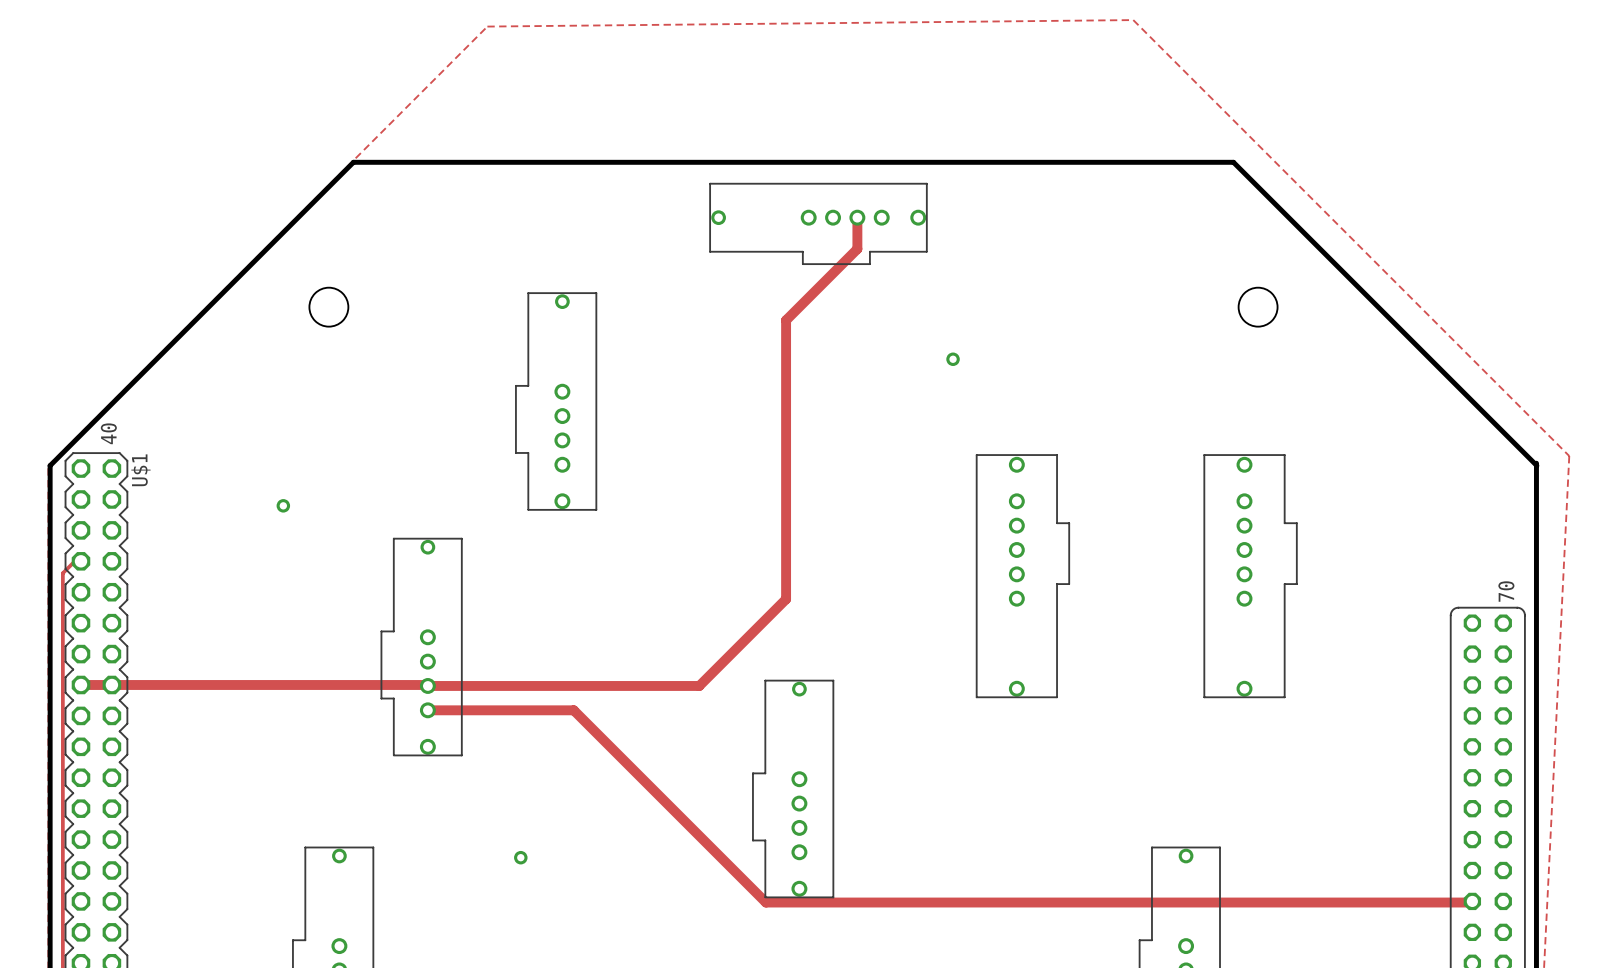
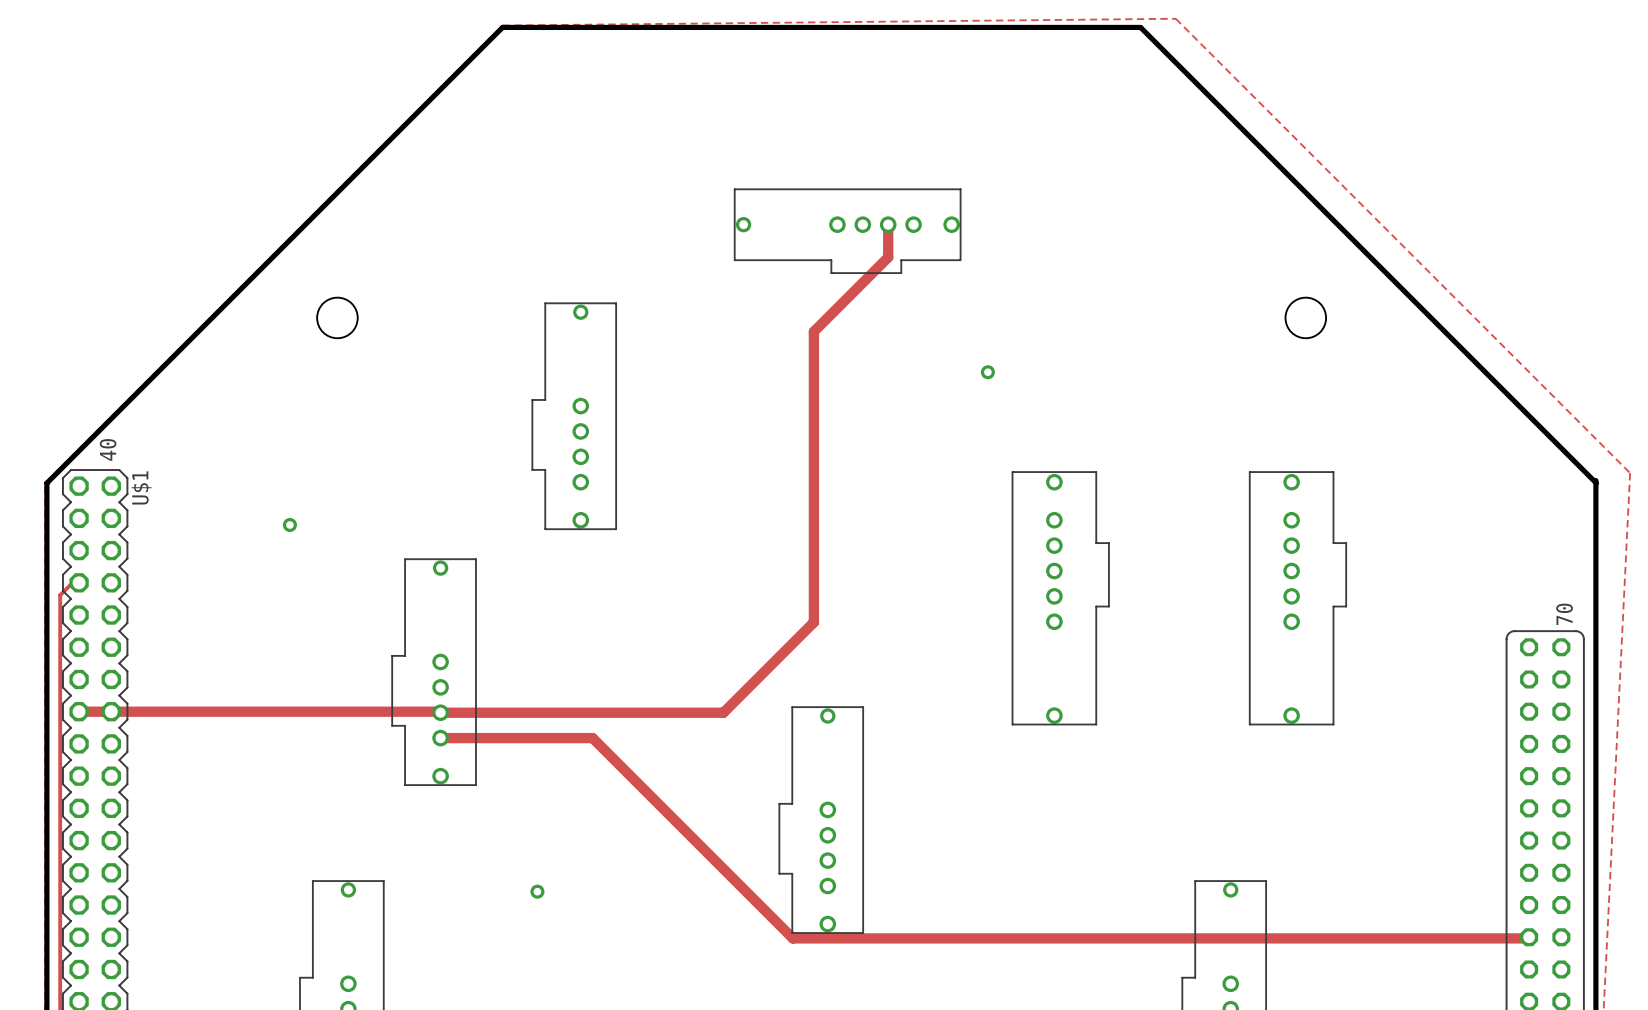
board edge: (353, 162) (1233, 162) -> (363, 166) (502, 27) (1140, 27) (1280, 166)

